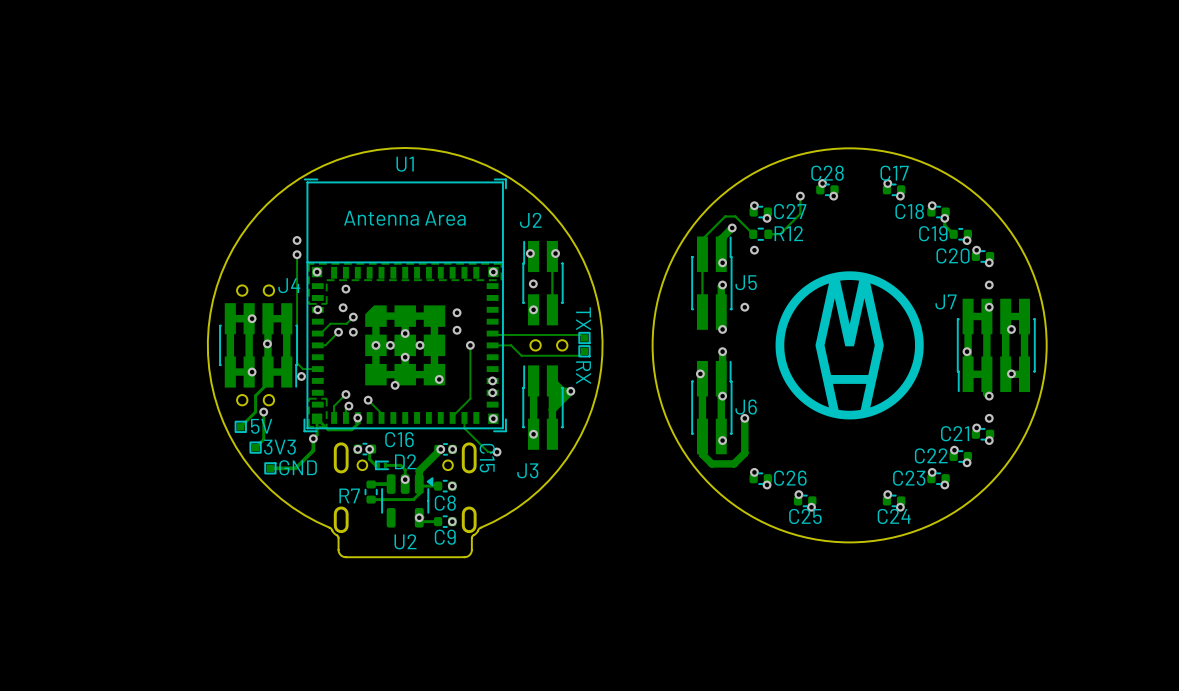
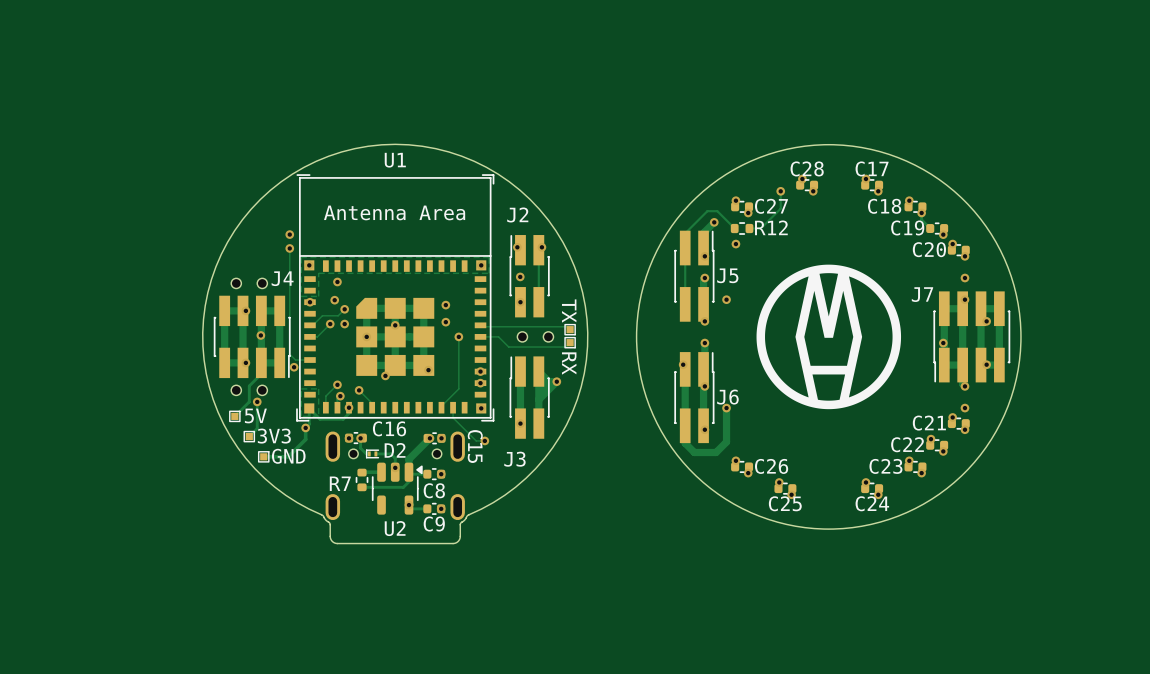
via: (390, 345) -> none
via: (420, 345) -> none
via: (405, 357) -> none

